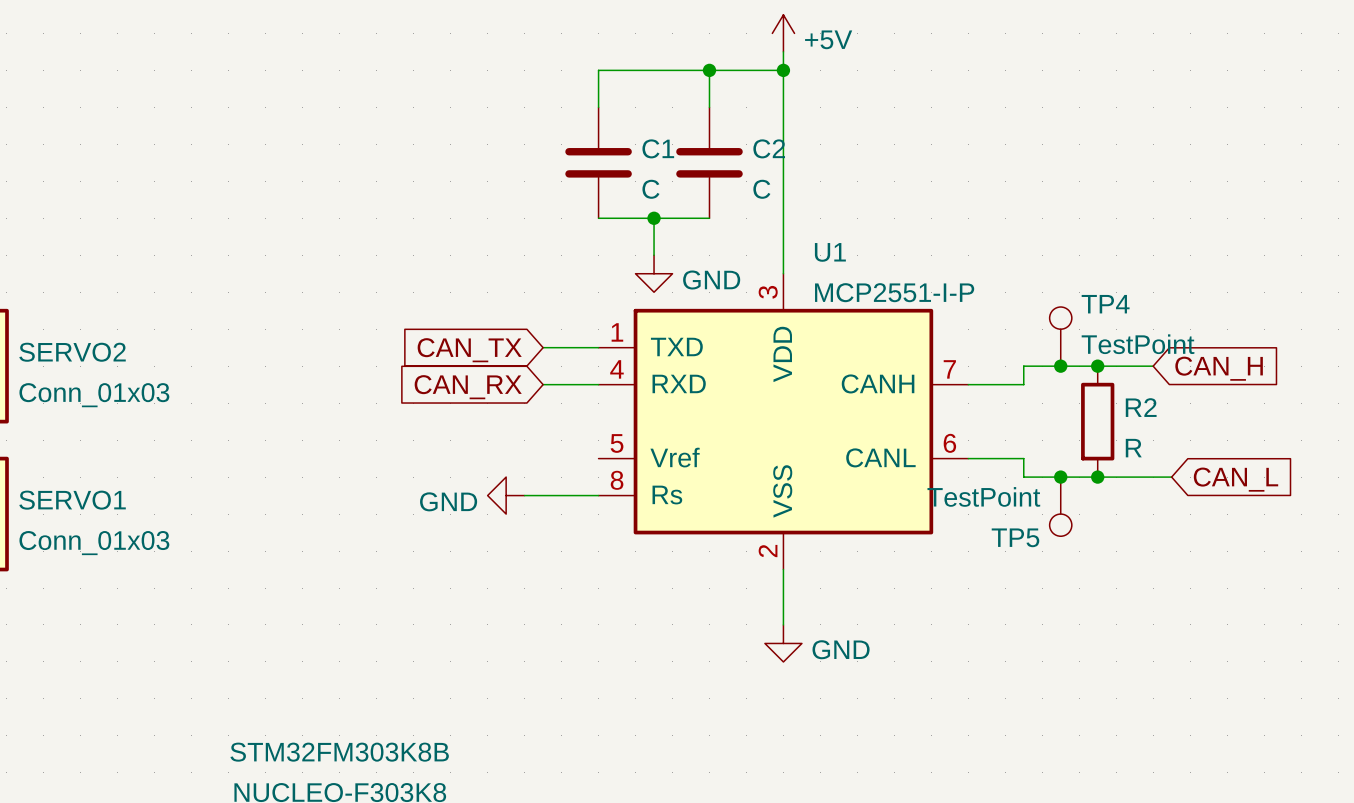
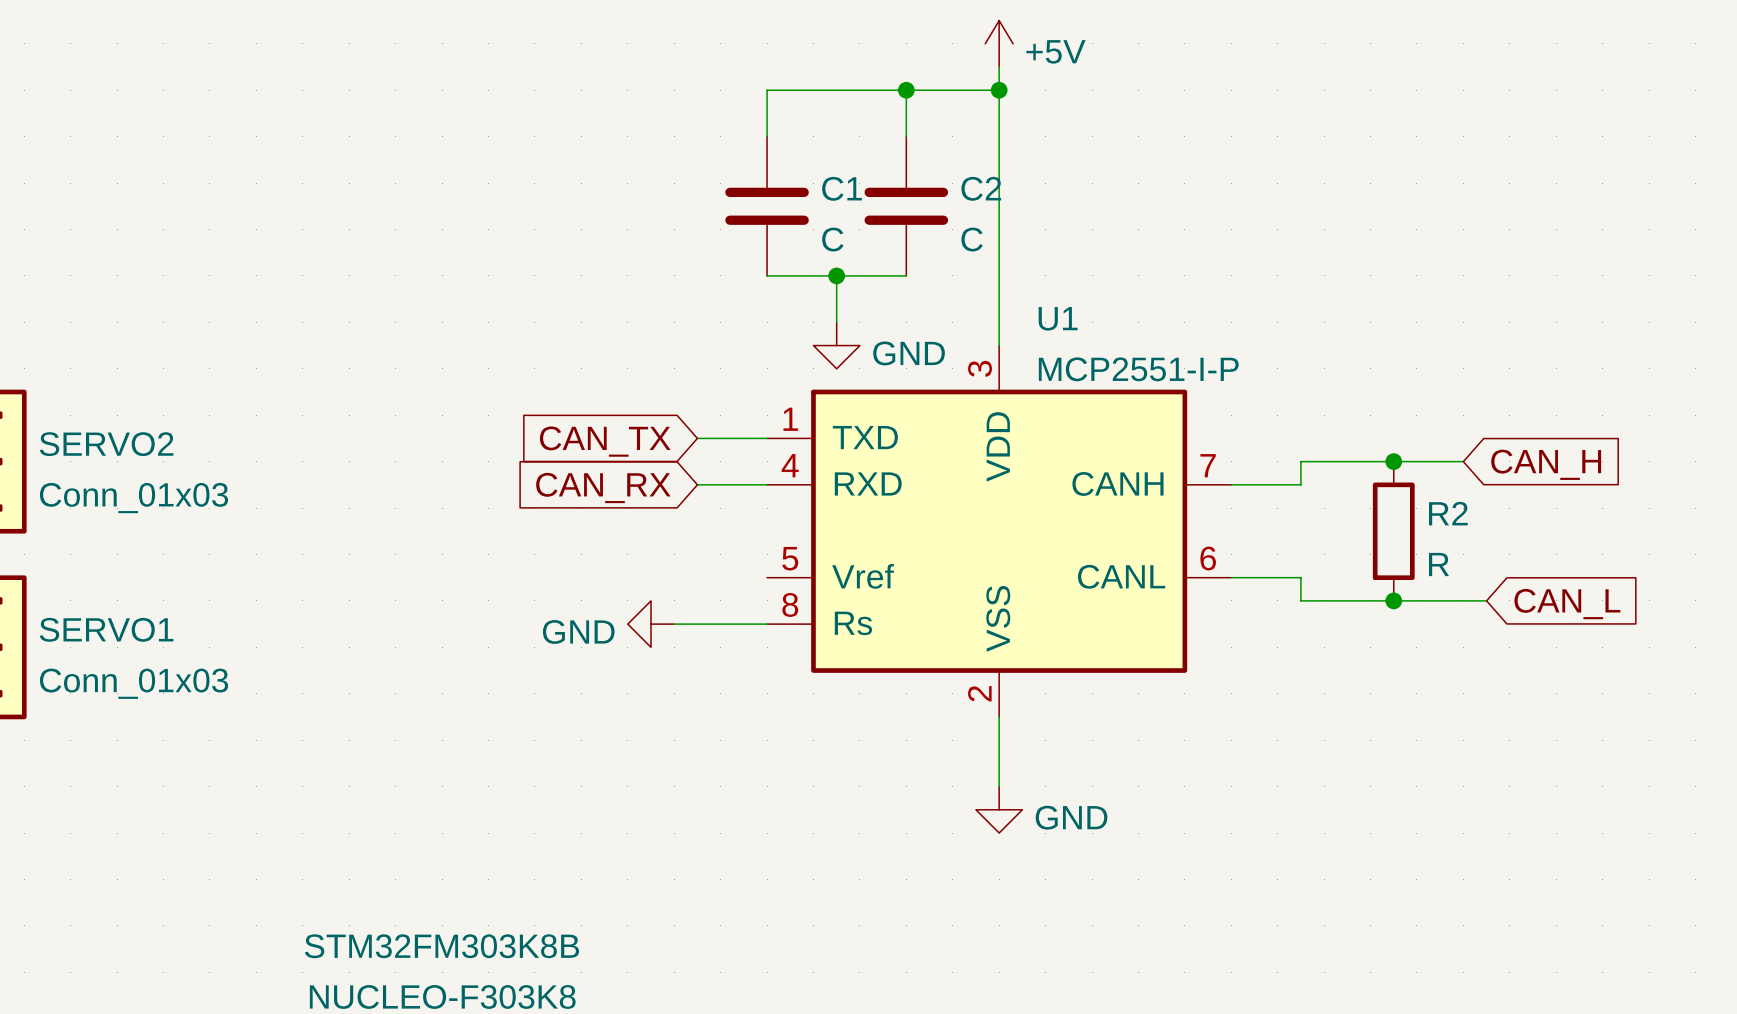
TP4: TestPoint (1060, 336) -> none
junction: (1060, 366) -> none
junction: (1060, 477) -> none
TP5: TestPoint (1060, 506) -> none

